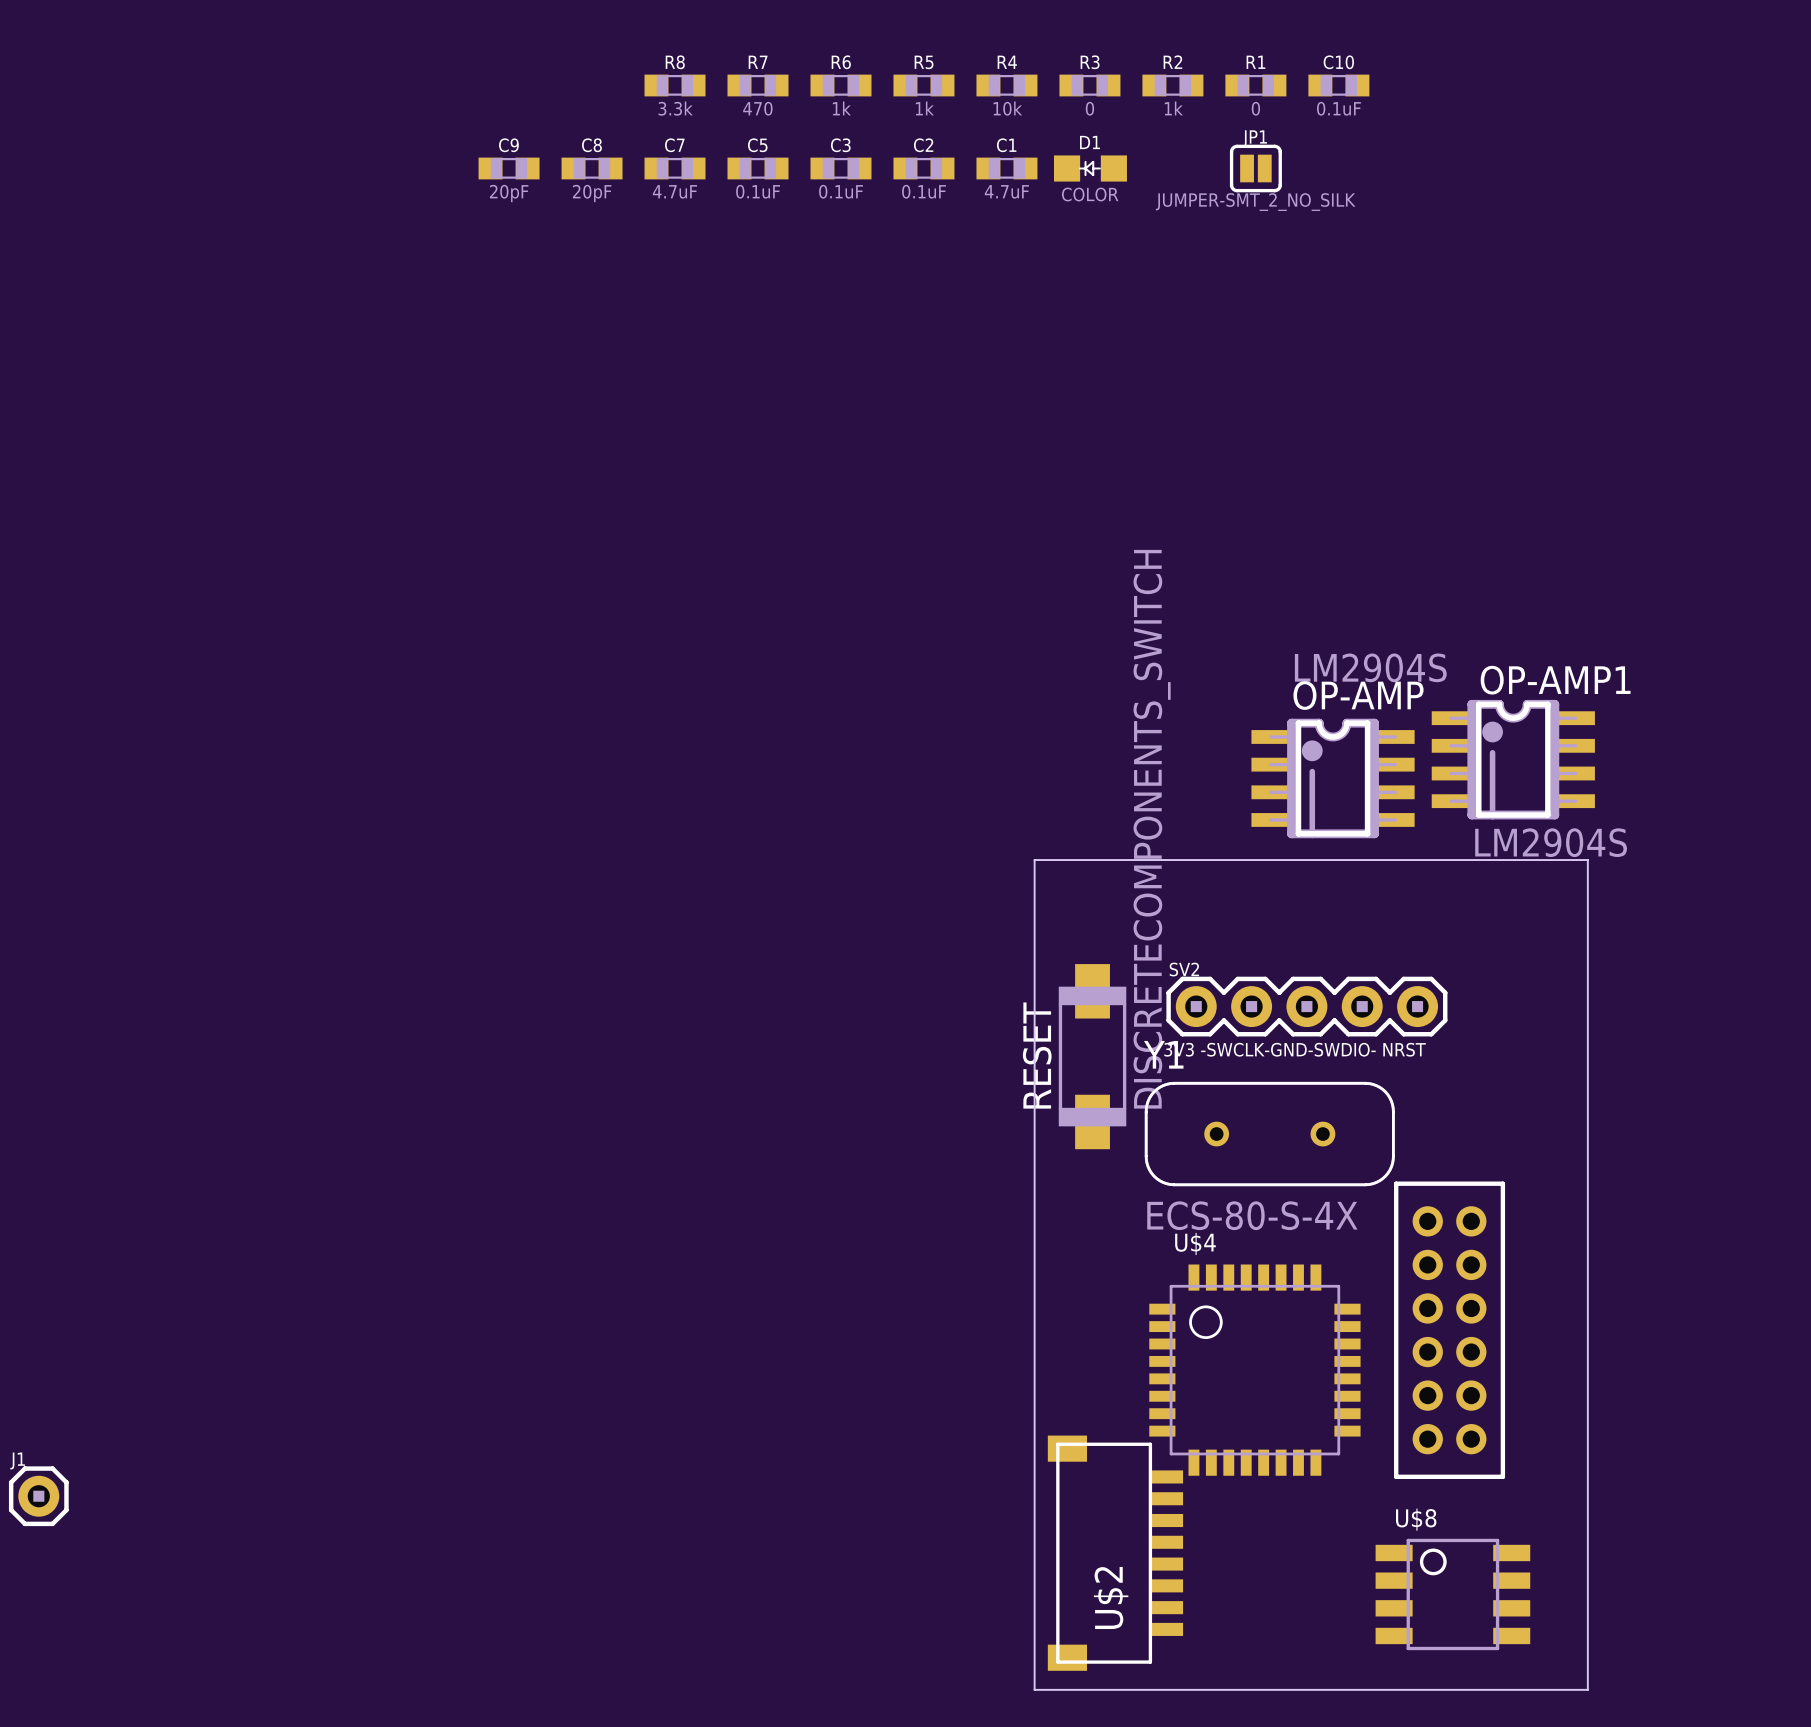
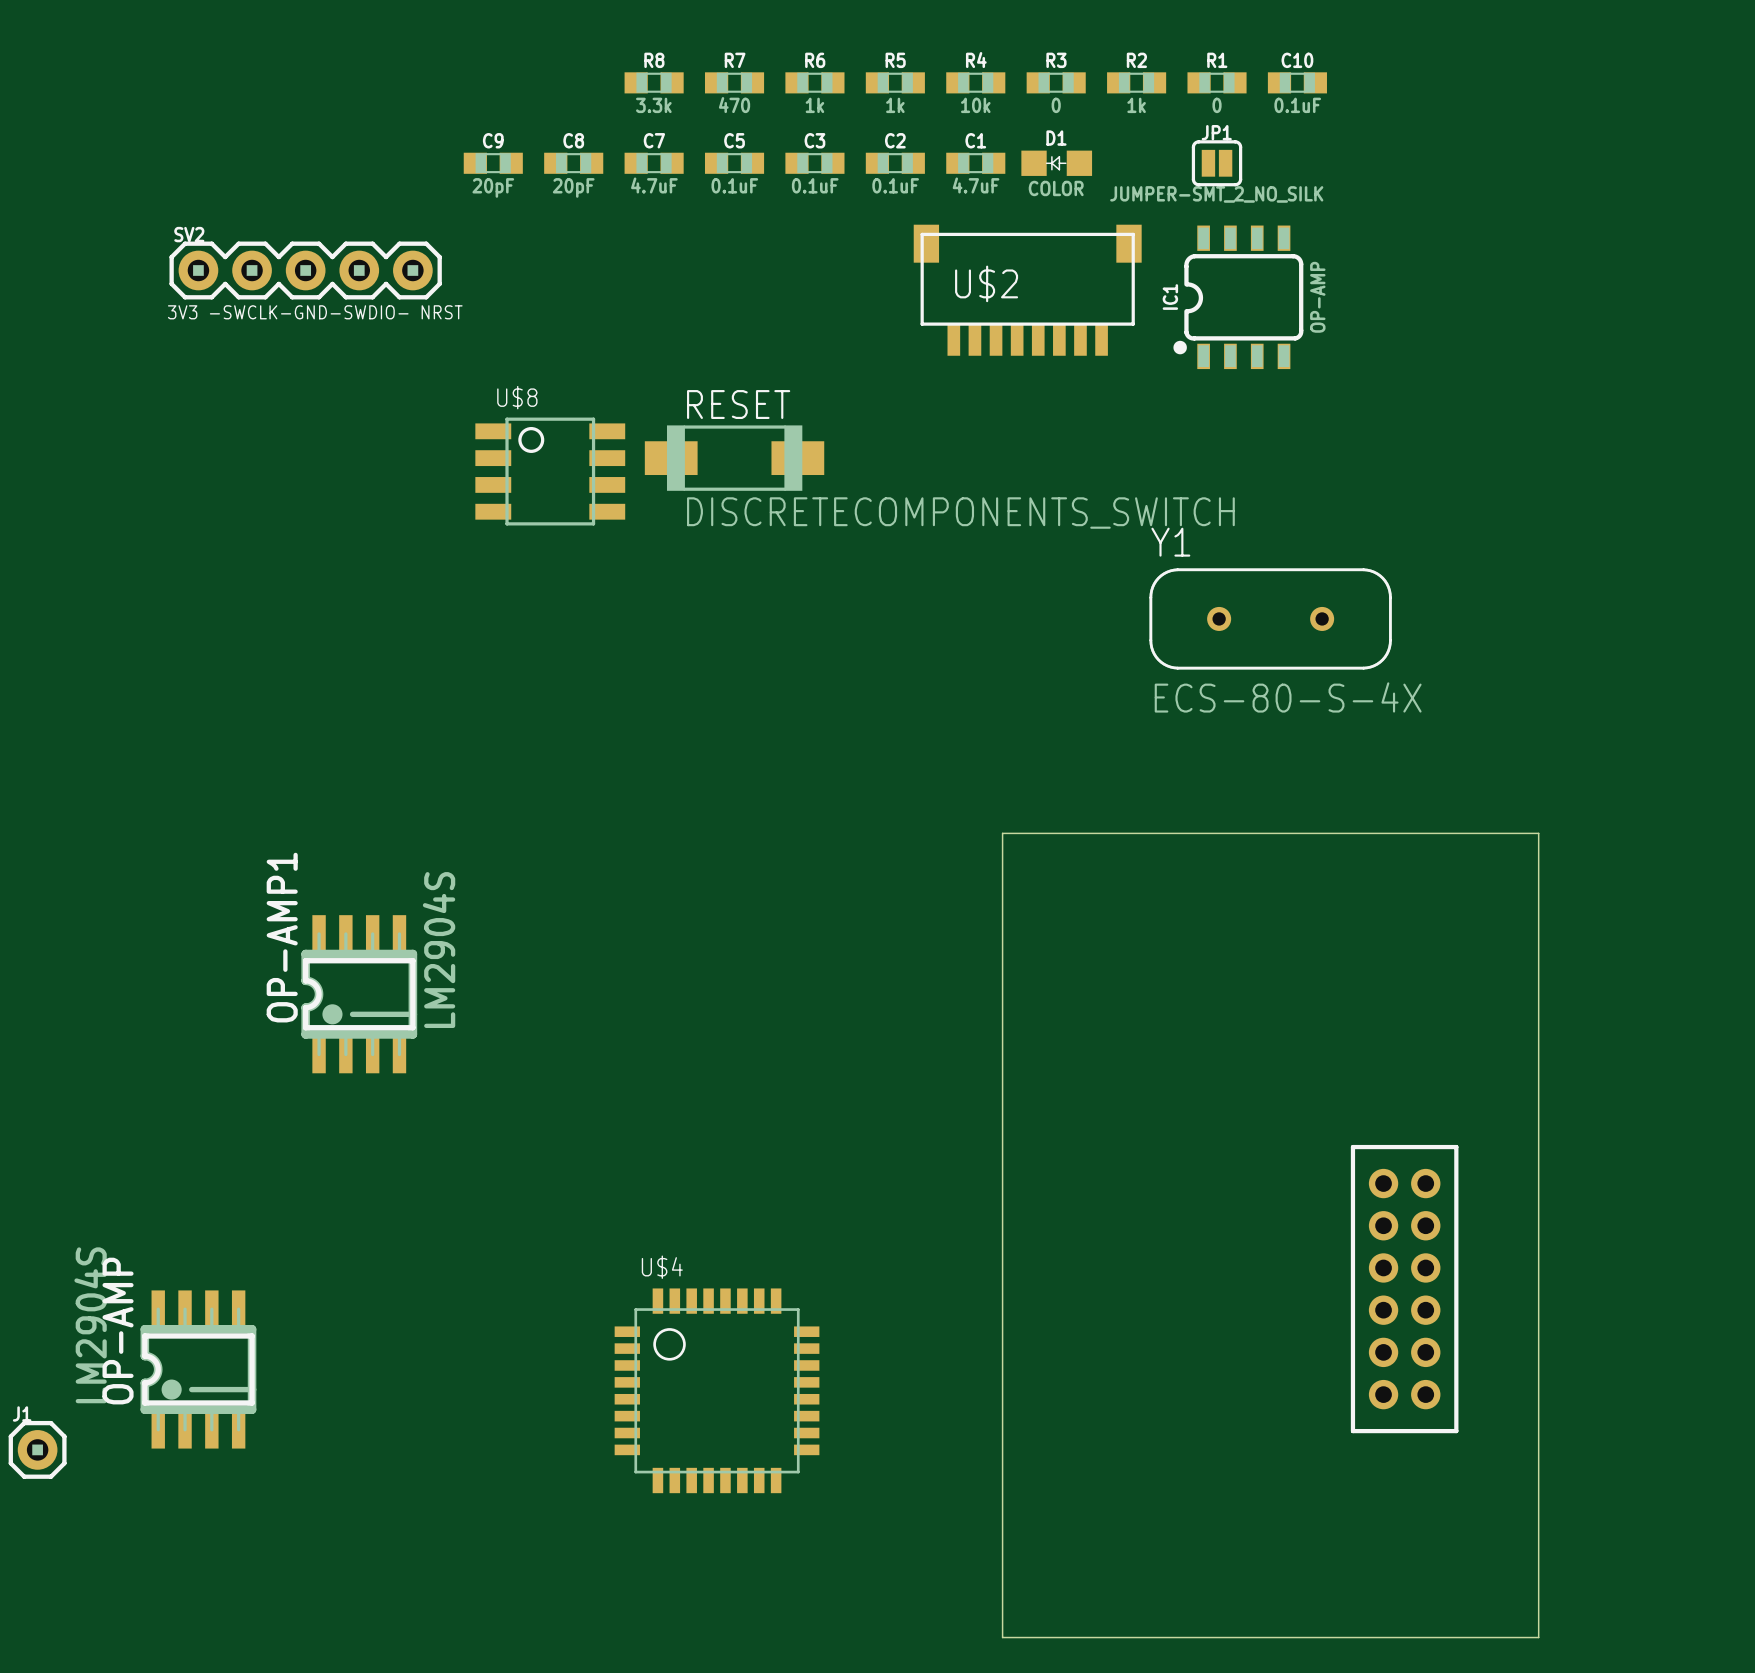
IC1: none -> OP-AMP (1238, 297)
RESET: none -> DISCRETECOMPONENTS_SWITCH (734, 458)
OP-AMP1 rotation: 0° (1513, 759) -> 90° counterclockwise (359, 994)
OP-AMP1 position: (1513, 759) -> (359, 994)
OP-AMP: LM2904S (1333, 778) -> none
SV2 position: (1306, 1006) -> (305, 270)
RESET: DISCRETECOMPONENTS_SWITCH (1092, 1056) -> none
Y1 position: (1269, 1134) -> (1270, 618)
U$4 position: (1254, 1370) -> (717, 1390)
OP-AMP: none -> LM2904S (198, 1369)
U$2 rotation: 0° (1115, 1553) -> 90° clockwise (1027, 290)
U$2 position: (1115, 1553) -> (1027, 290)
U$8 position: (1452, 1594) -> (550, 471)

